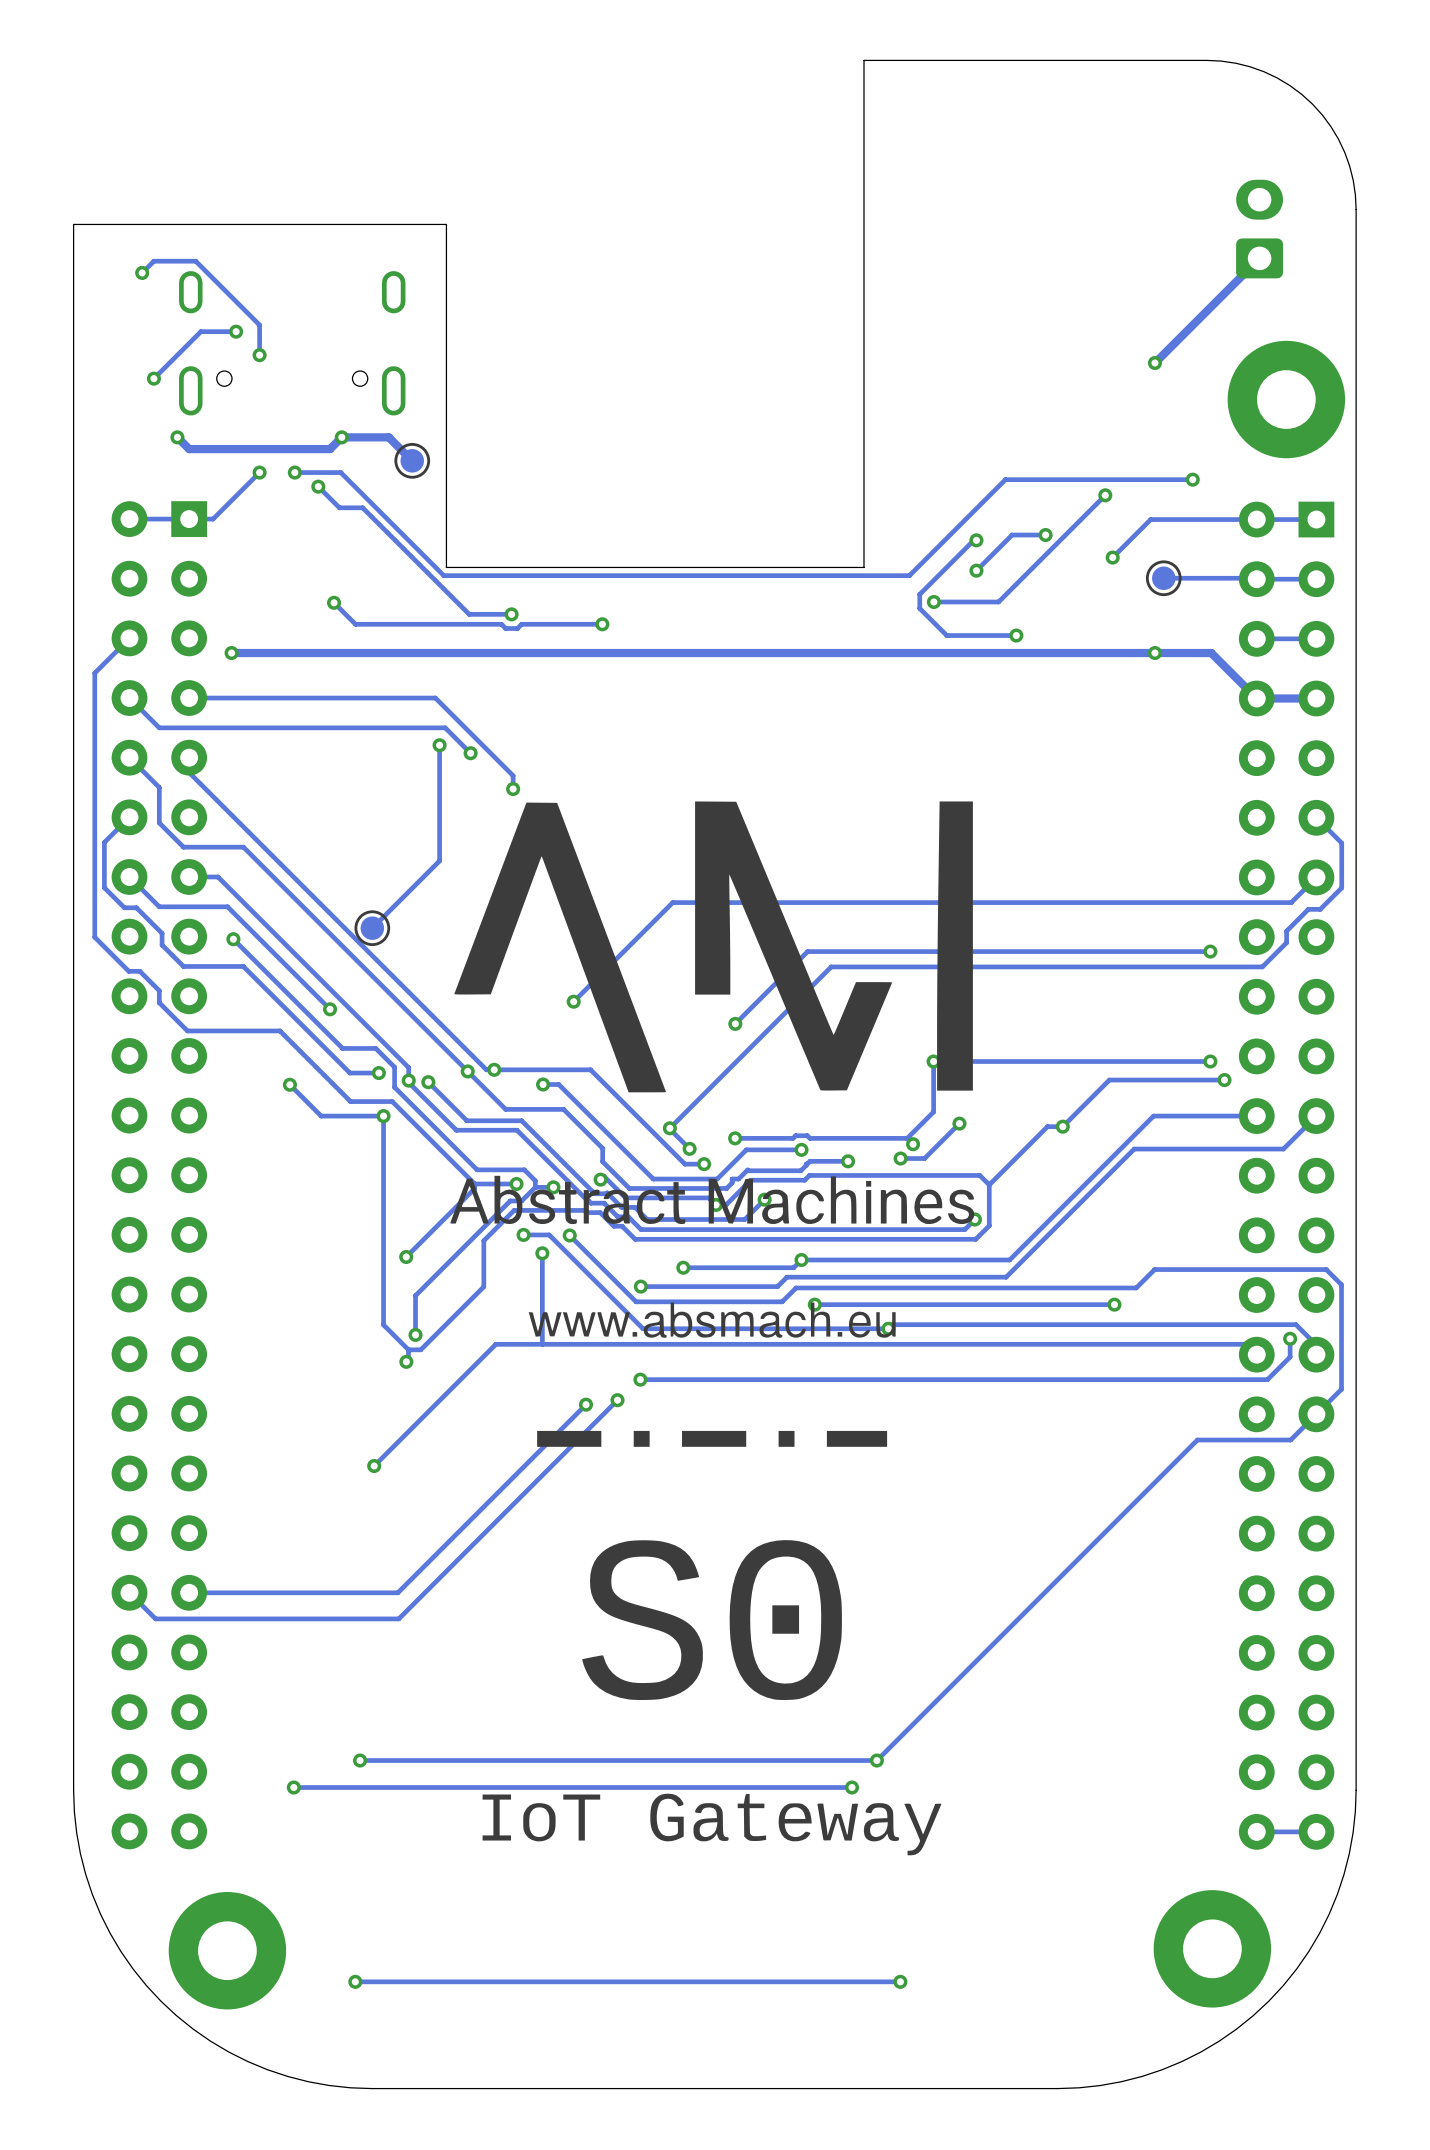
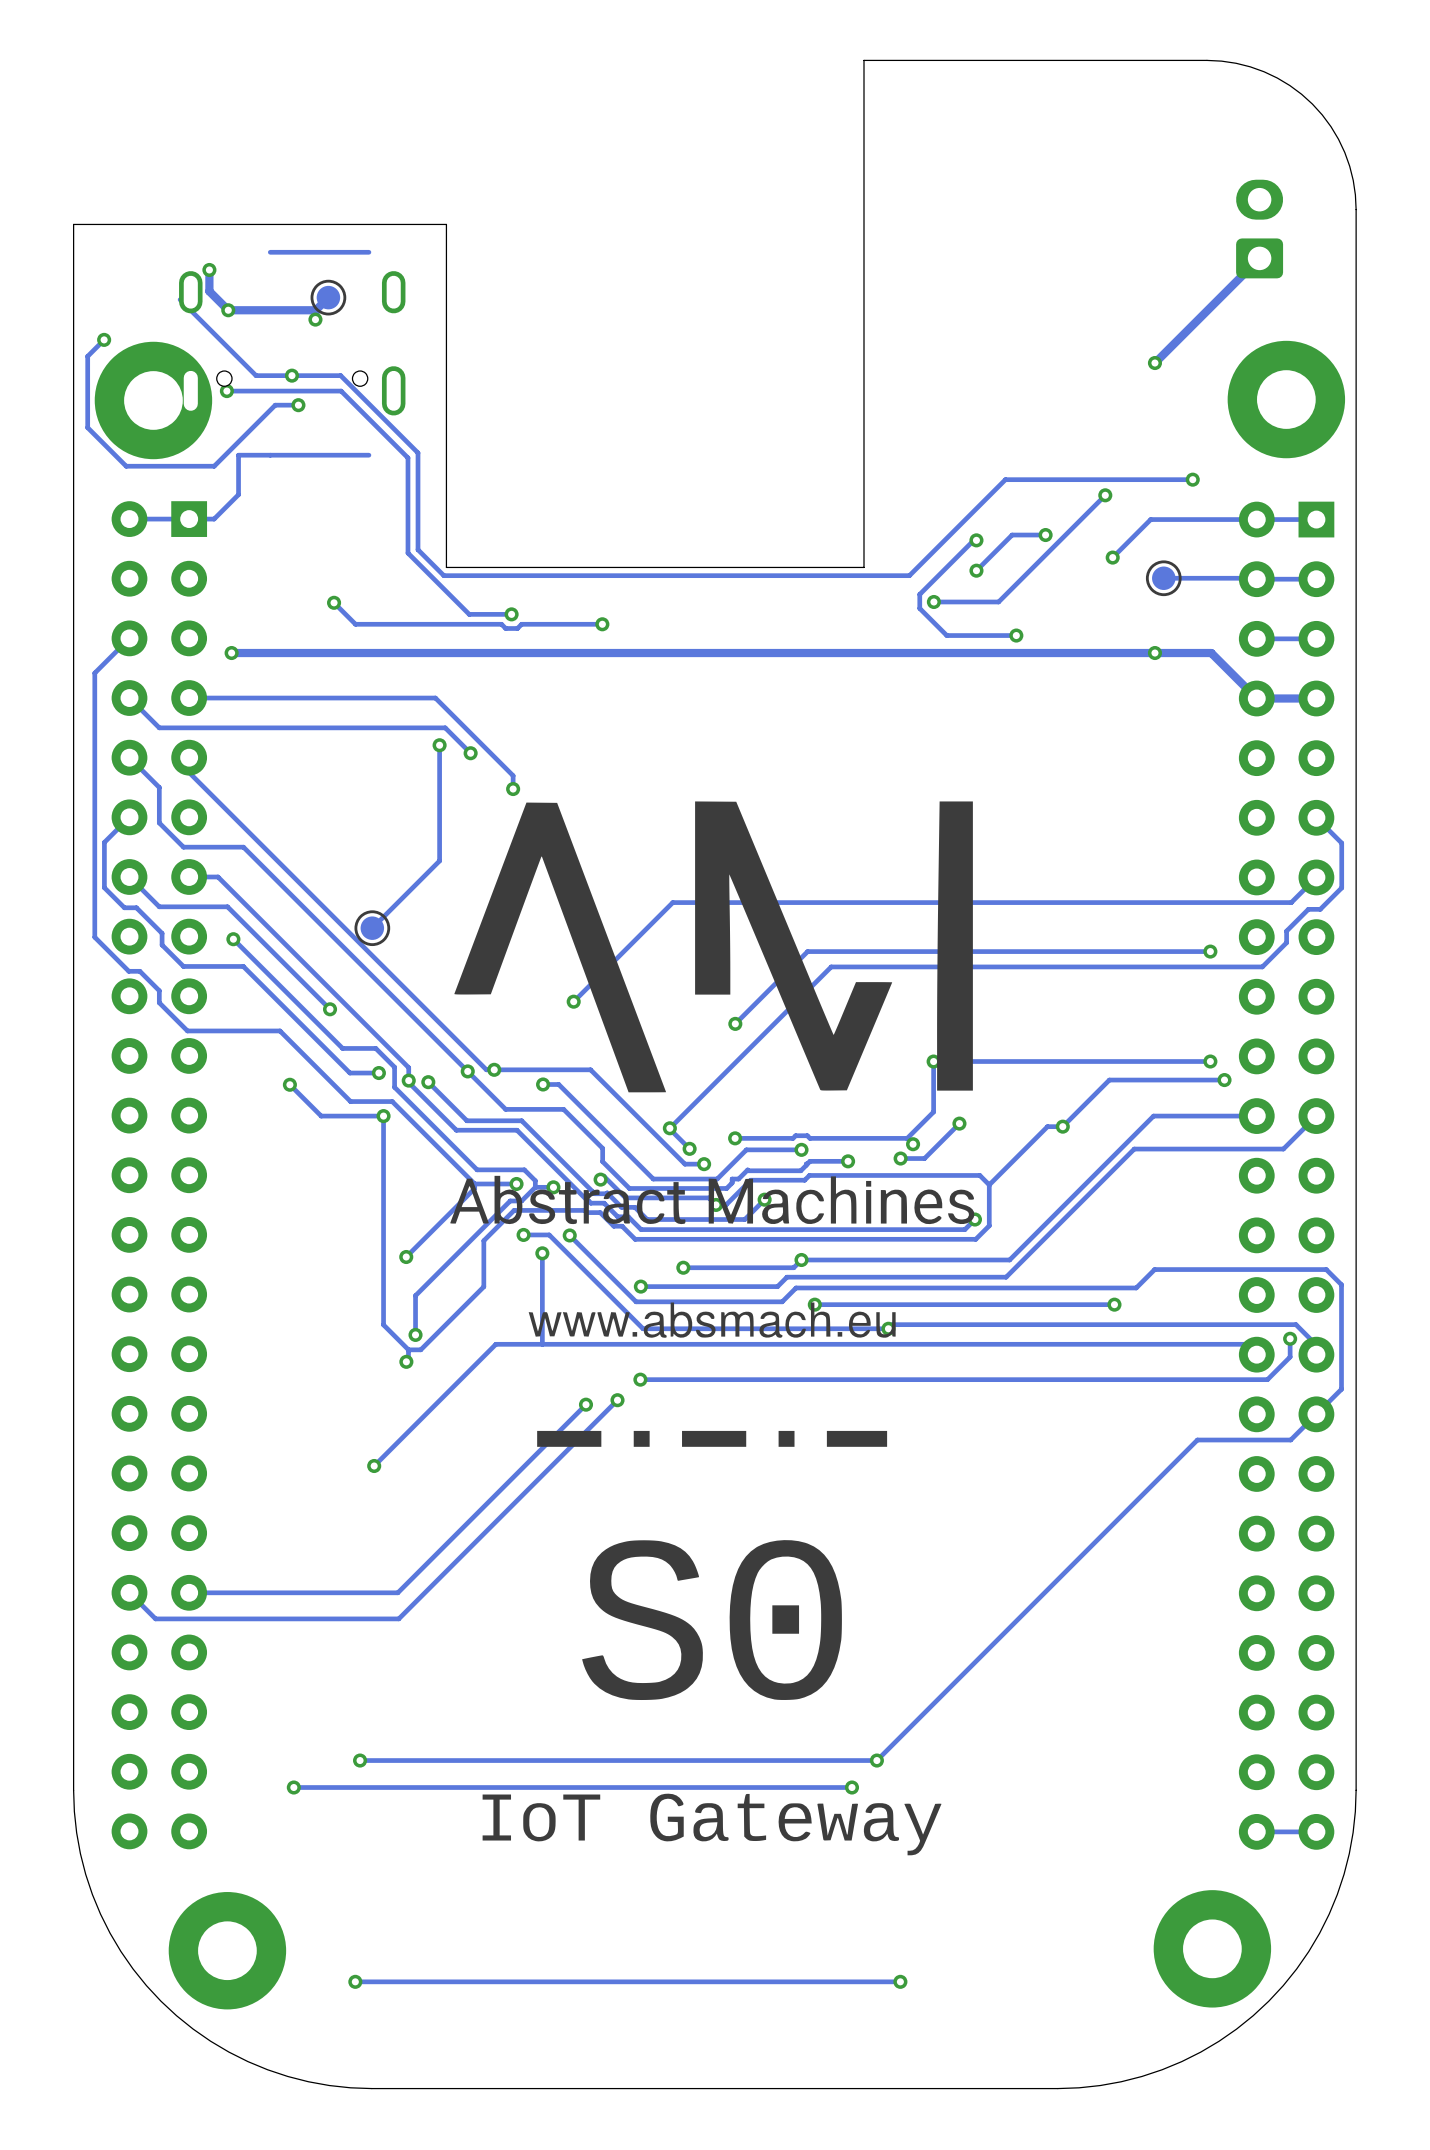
track: none -> (368, 252) (270, 252)
track: none -> (209, 269) (209, 291) (228, 310) (315, 310) (328, 297)
via: none -> (209, 269)
track: (142, 272) (153, 261) (195, 261) (259, 325) (259, 355) -> none
via: (142, 272) -> none
via: none -> (315, 319)
track: (236, 331) (200, 331) (153, 378) -> none
via position: (236, 331) -> (228, 310)
track: none -> (104, 339) (87, 356) (87, 427) (126, 466) (214, 466) (275, 405) (298, 405)
via: none -> (104, 339)
via: (259, 355) -> none
via: none -> (291, 375)
via: (153, 378) -> none
via: none -> (226, 391)
part: none -> (153, 400)
via: none -> (298, 405)
track: (177, 437) (189, 449) (330, 449) (341, 437) (388, 437) (412, 460) -> none
via: (177, 437) -> none
via: (341, 437) -> none
part position: (412, 460) -> (328, 297)
track: (259, 472) (213, 519) -> (368, 455) (238, 455) (238, 494) (213, 519)
via: (259, 472) -> none
track: (294, 472) (340, 472) (418, 549) -> (180, 299) (256, 375) (340, 375) (418, 452) (418, 549)
via: (294, 472) -> none
track: (318, 486) (339, 507) (362, 507) (407, 553) -> (226, 391) (341, 391) (407, 457) (407, 553)
via: (318, 486) -> none

